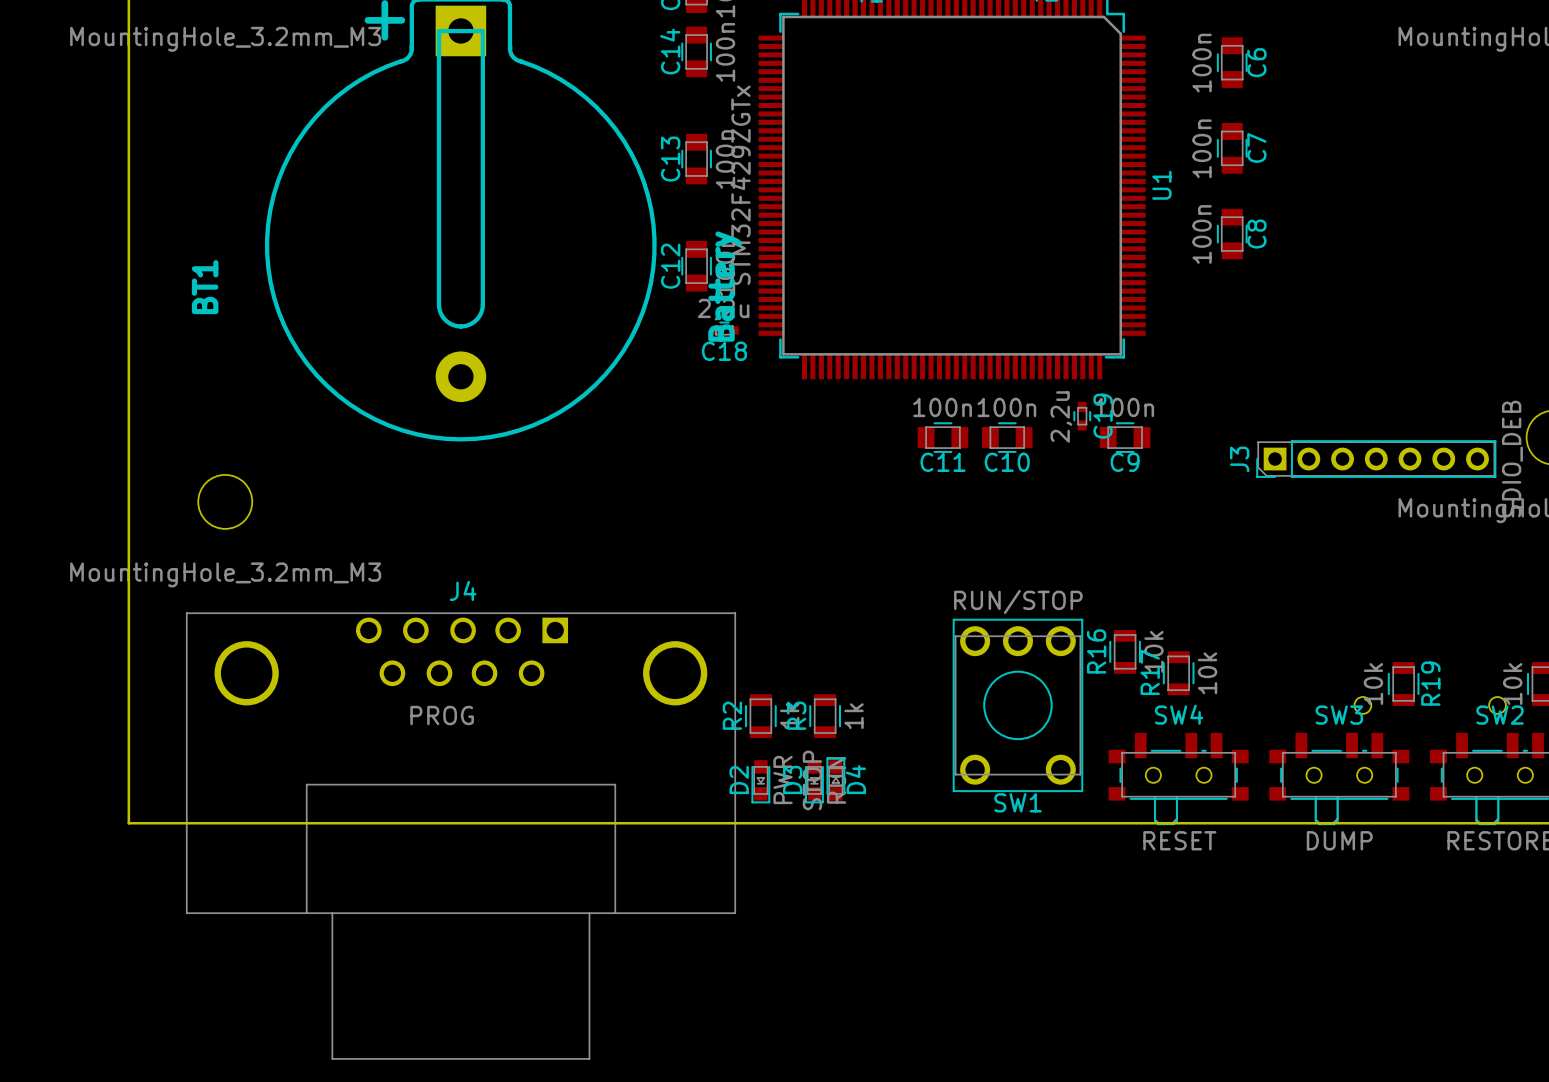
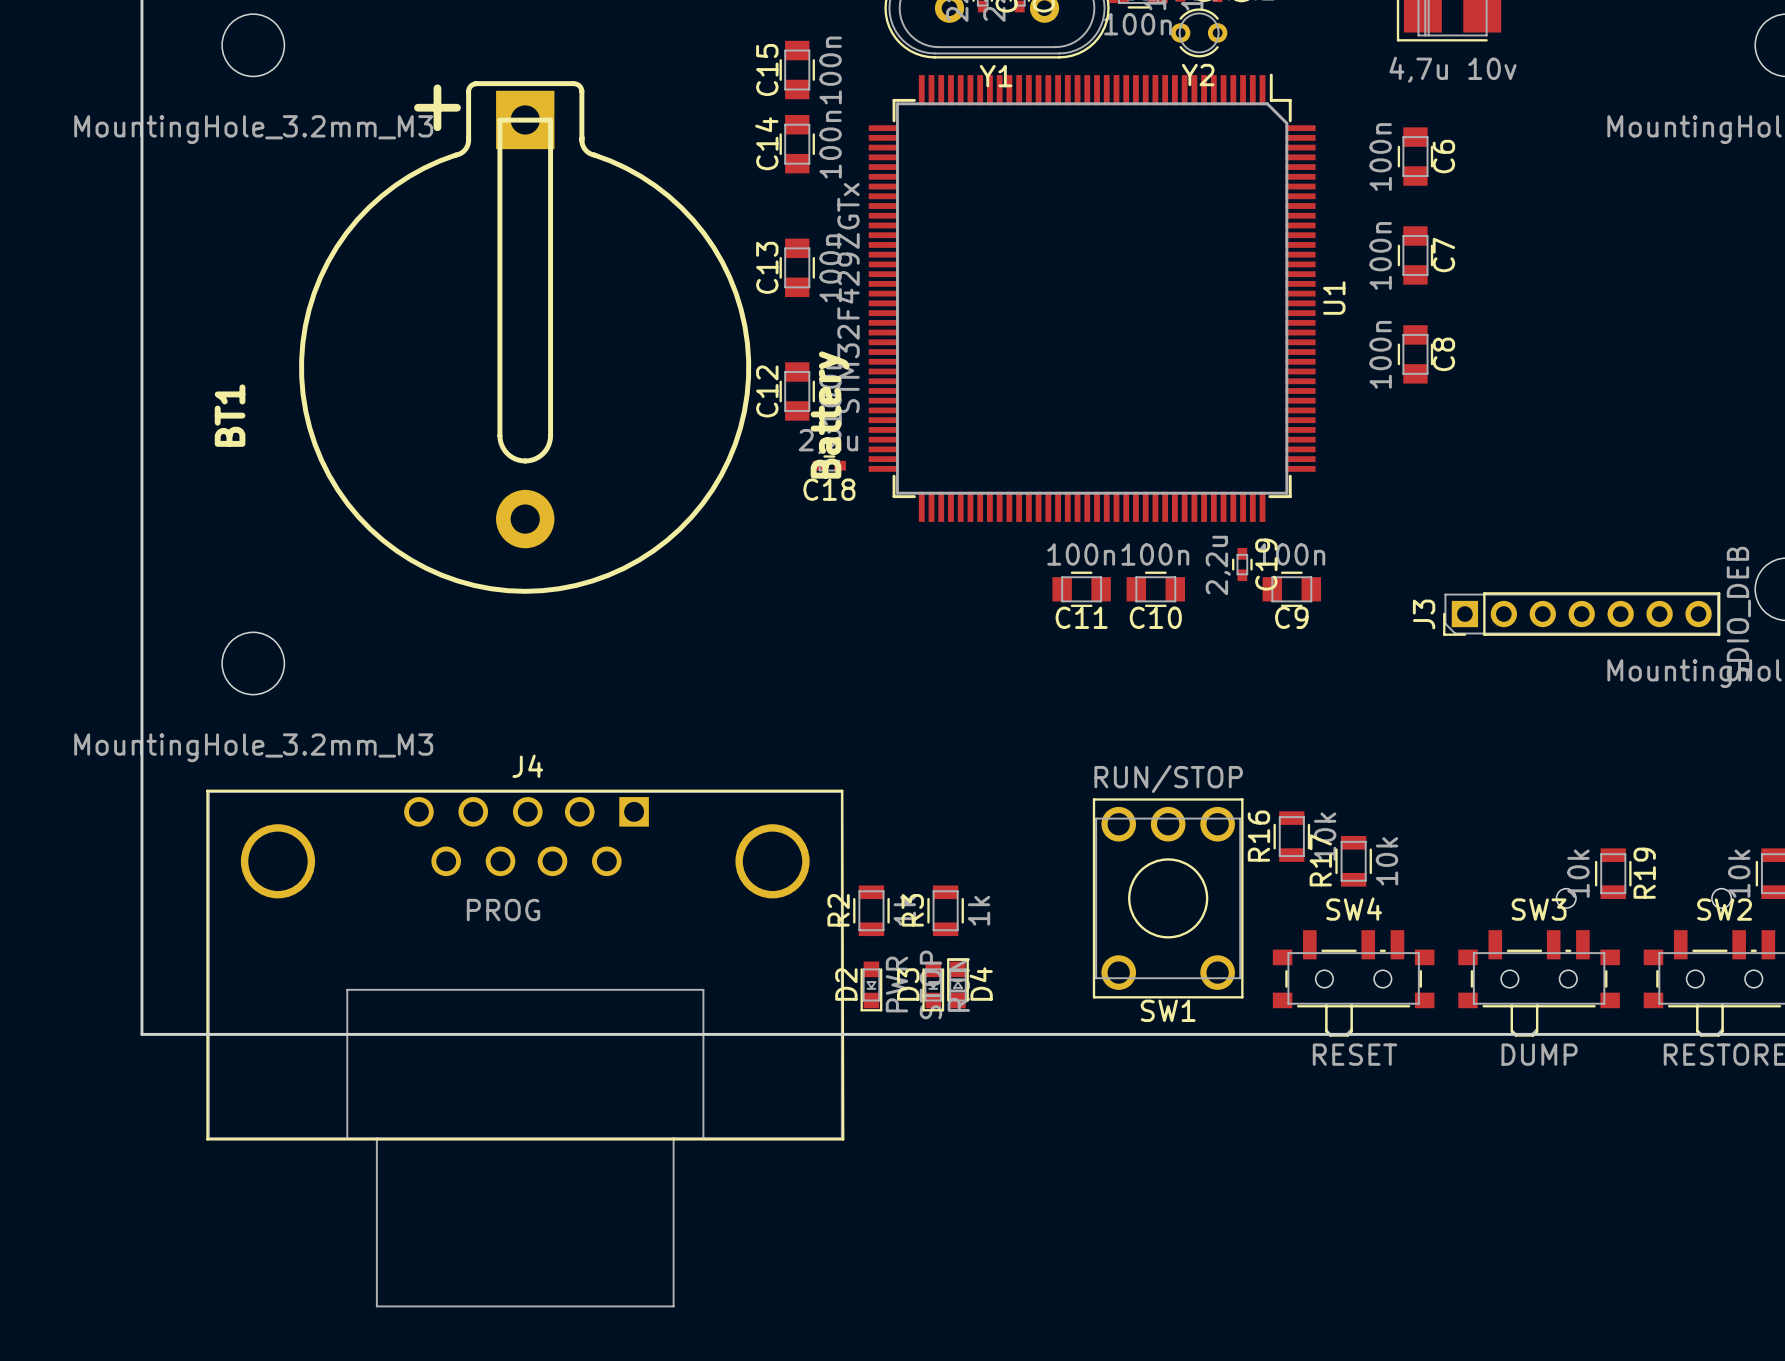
J4 footprint: [185, 612, 737, 1060] -> [206, 789, 845, 1308]

